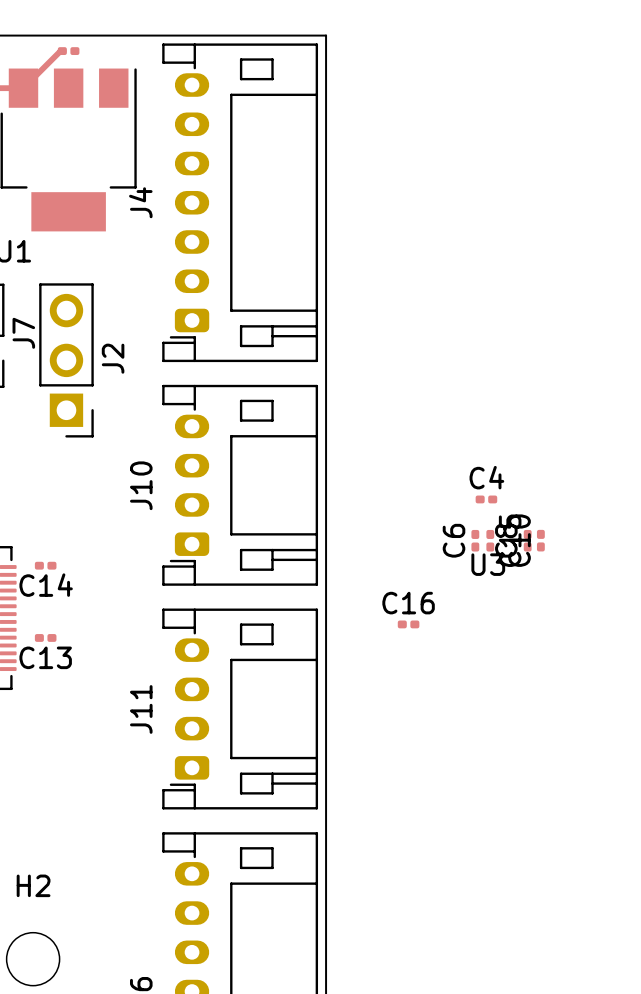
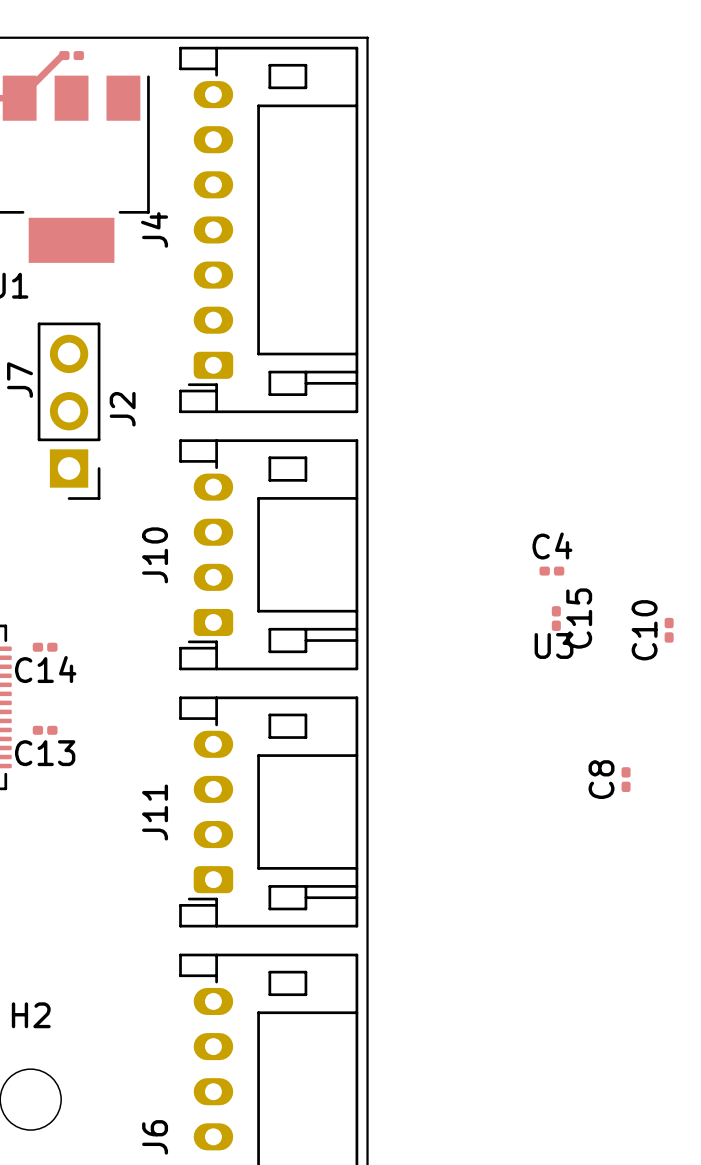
C6: (475, 540) -> none
C8 position: (527, 540) -> (626, 779)
C10 position: (540, 540) -> (669, 630)
C16: (408, 624) -> none

